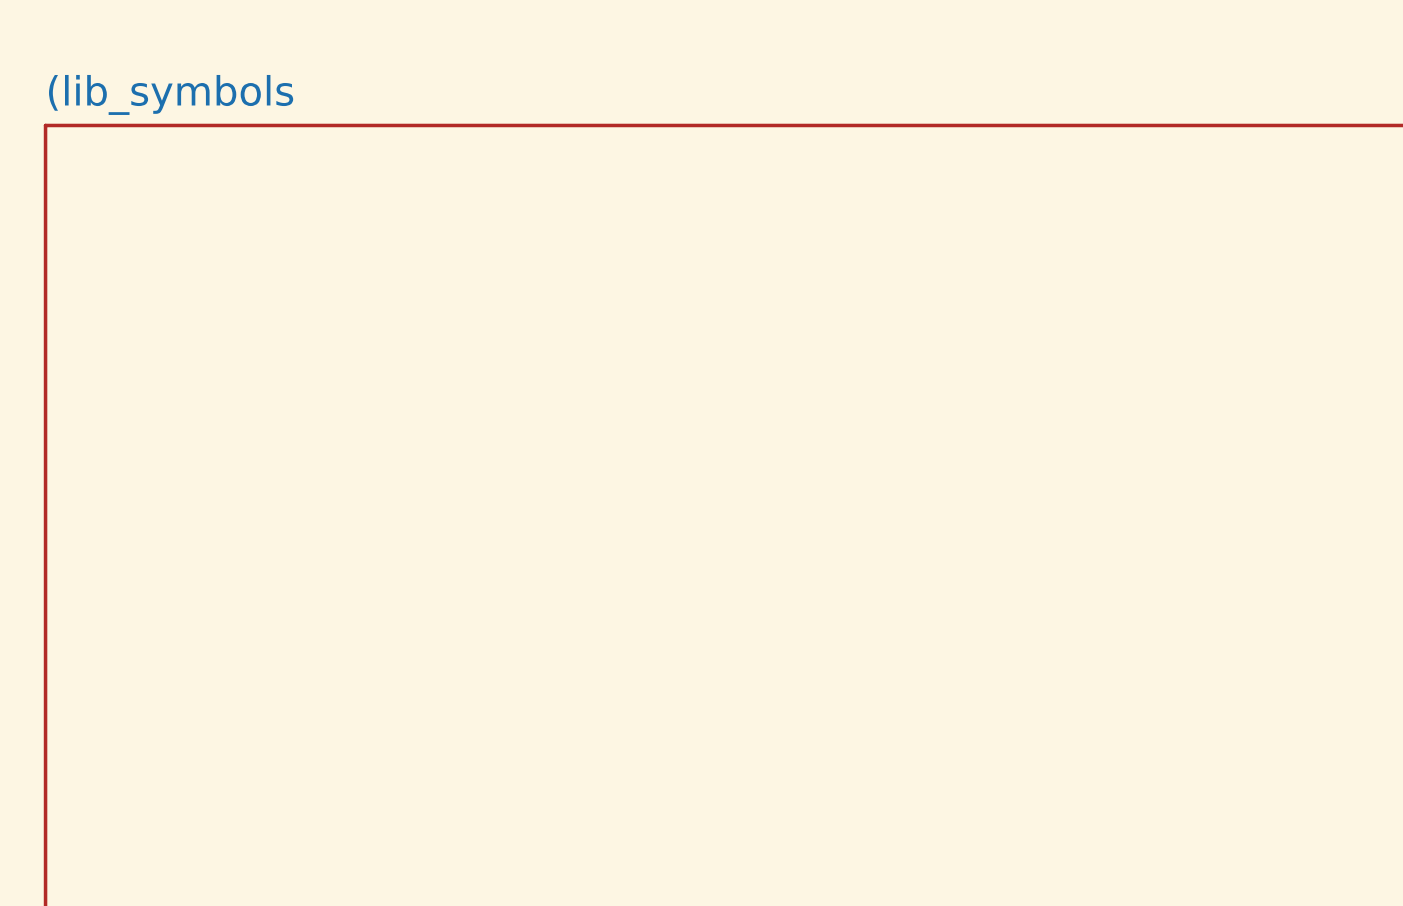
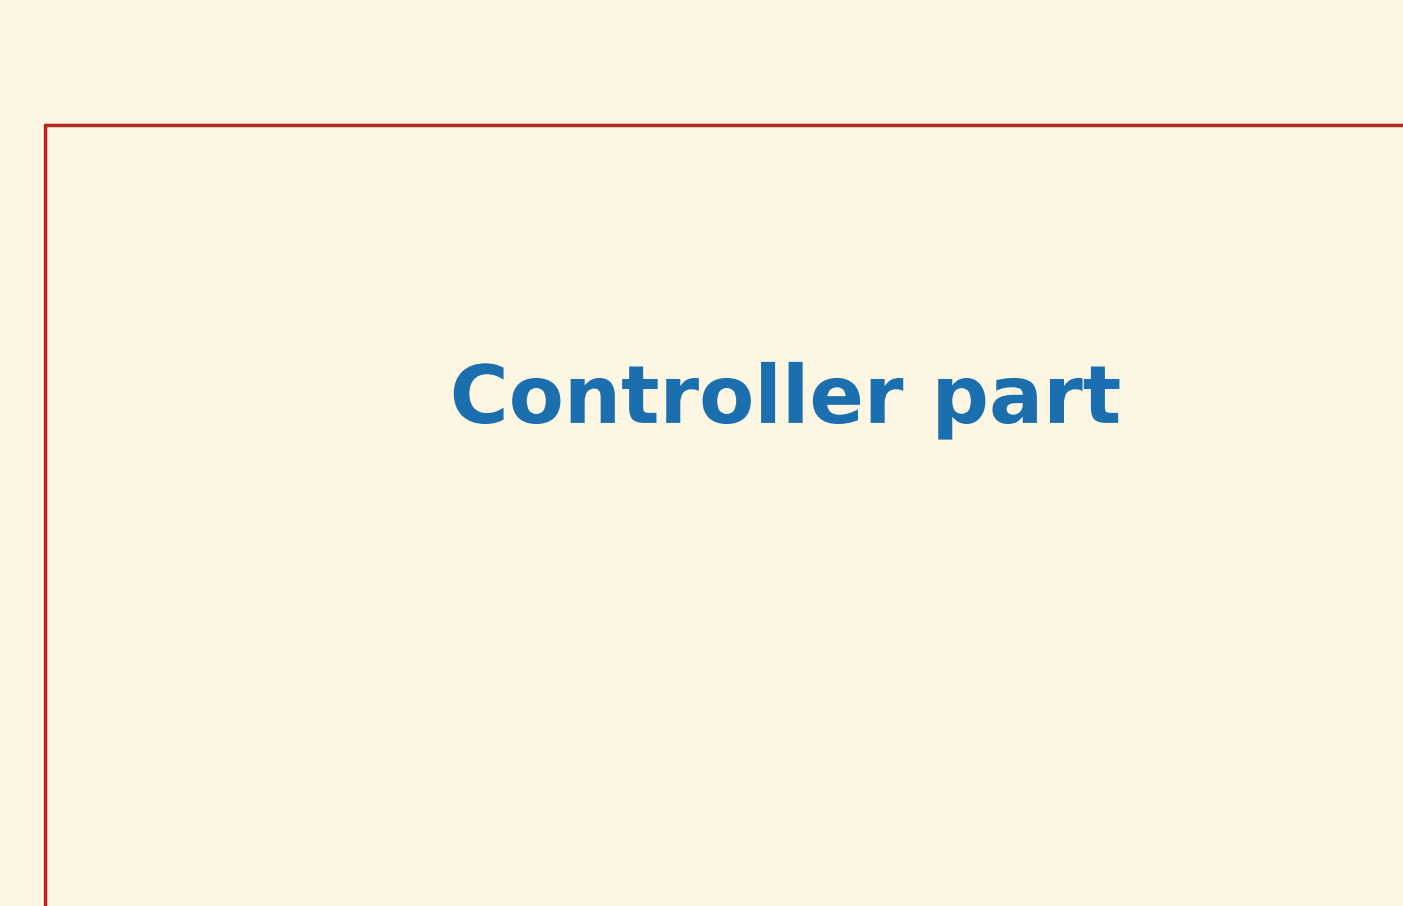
sheet (lib_symbols name: (lib_symbols (171, 94) -> Controller part (786, 400)

